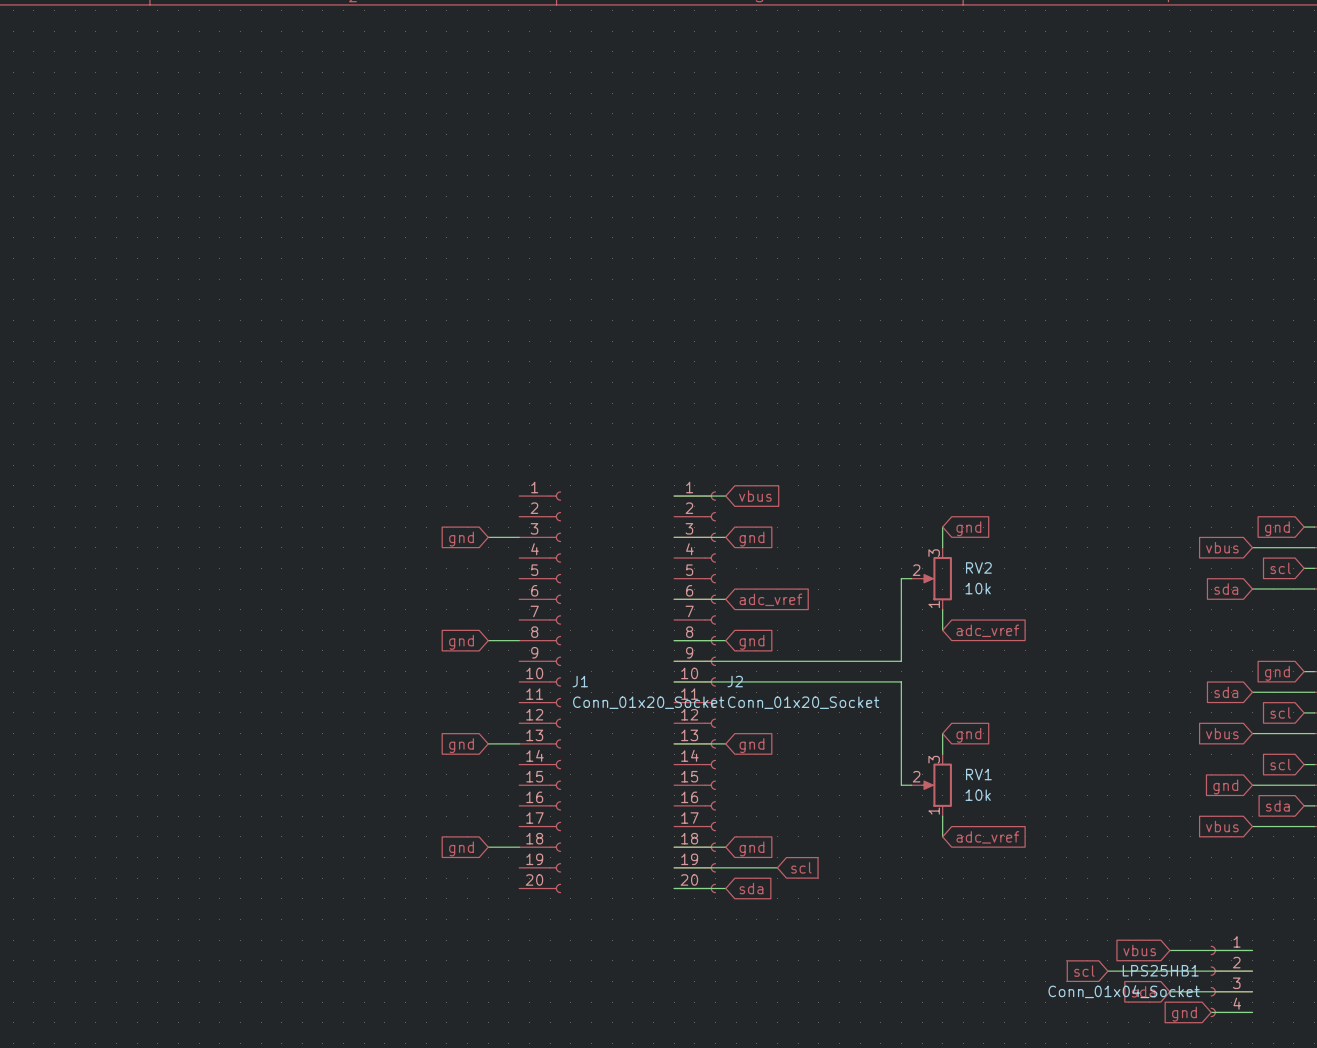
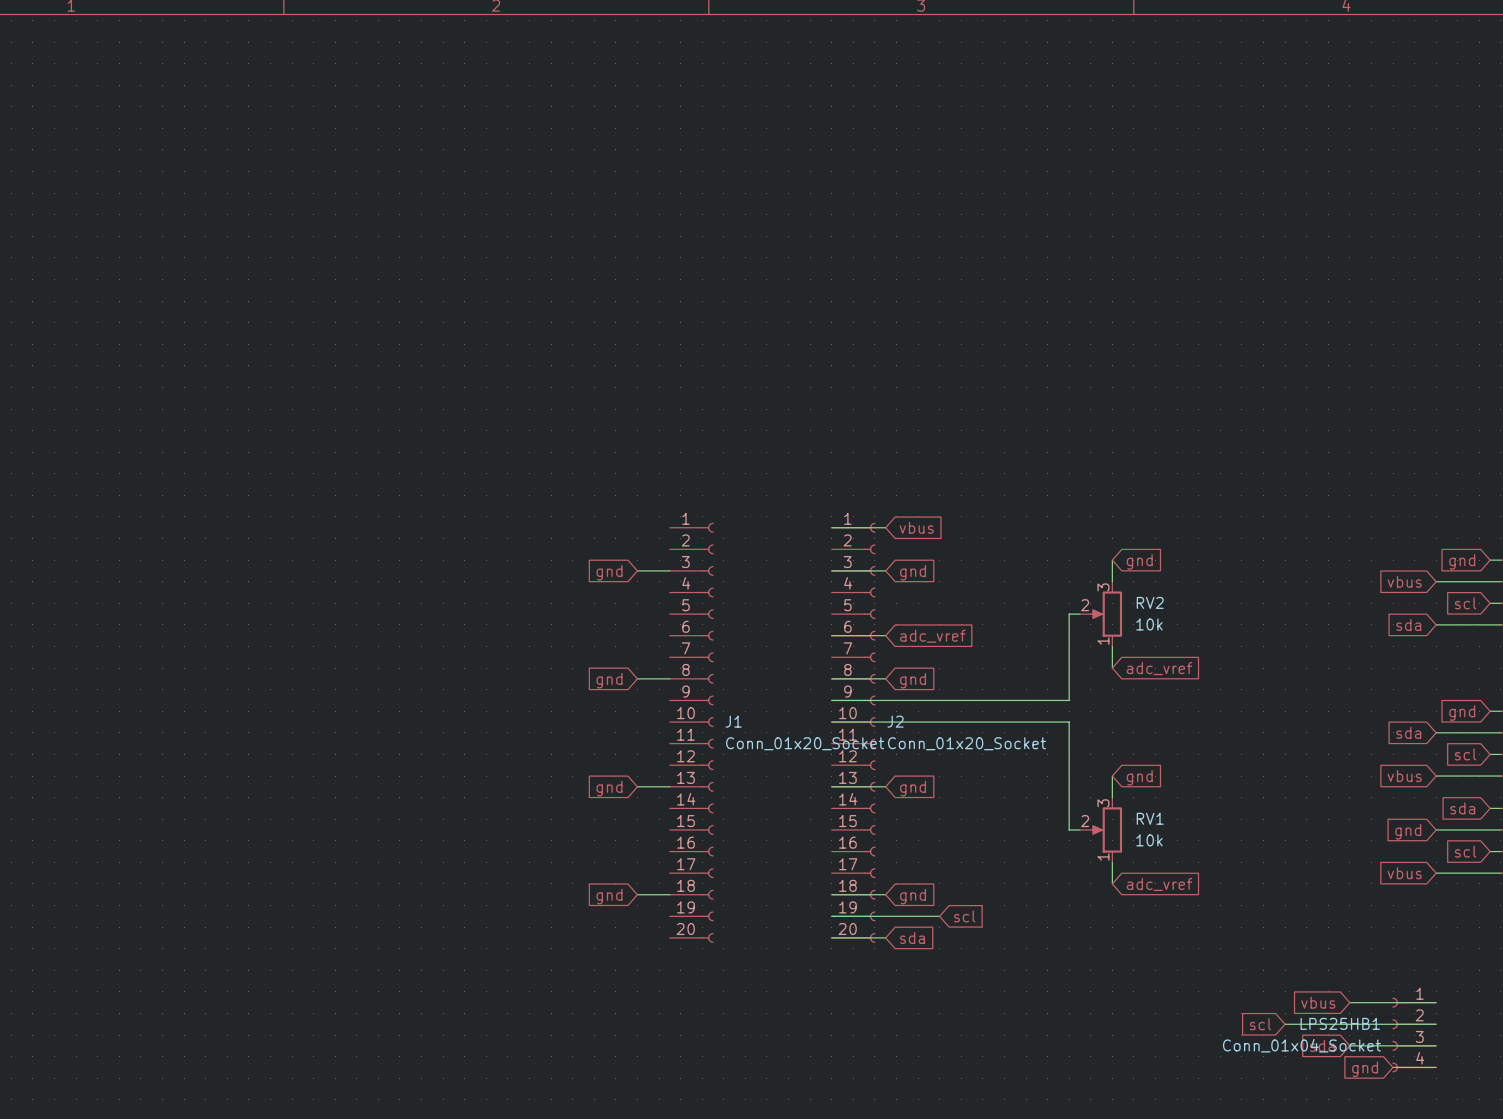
global label: scl (1280, 764) -> sda (1462, 808)
global label: sda (1277, 805) -> scl (1465, 851)

